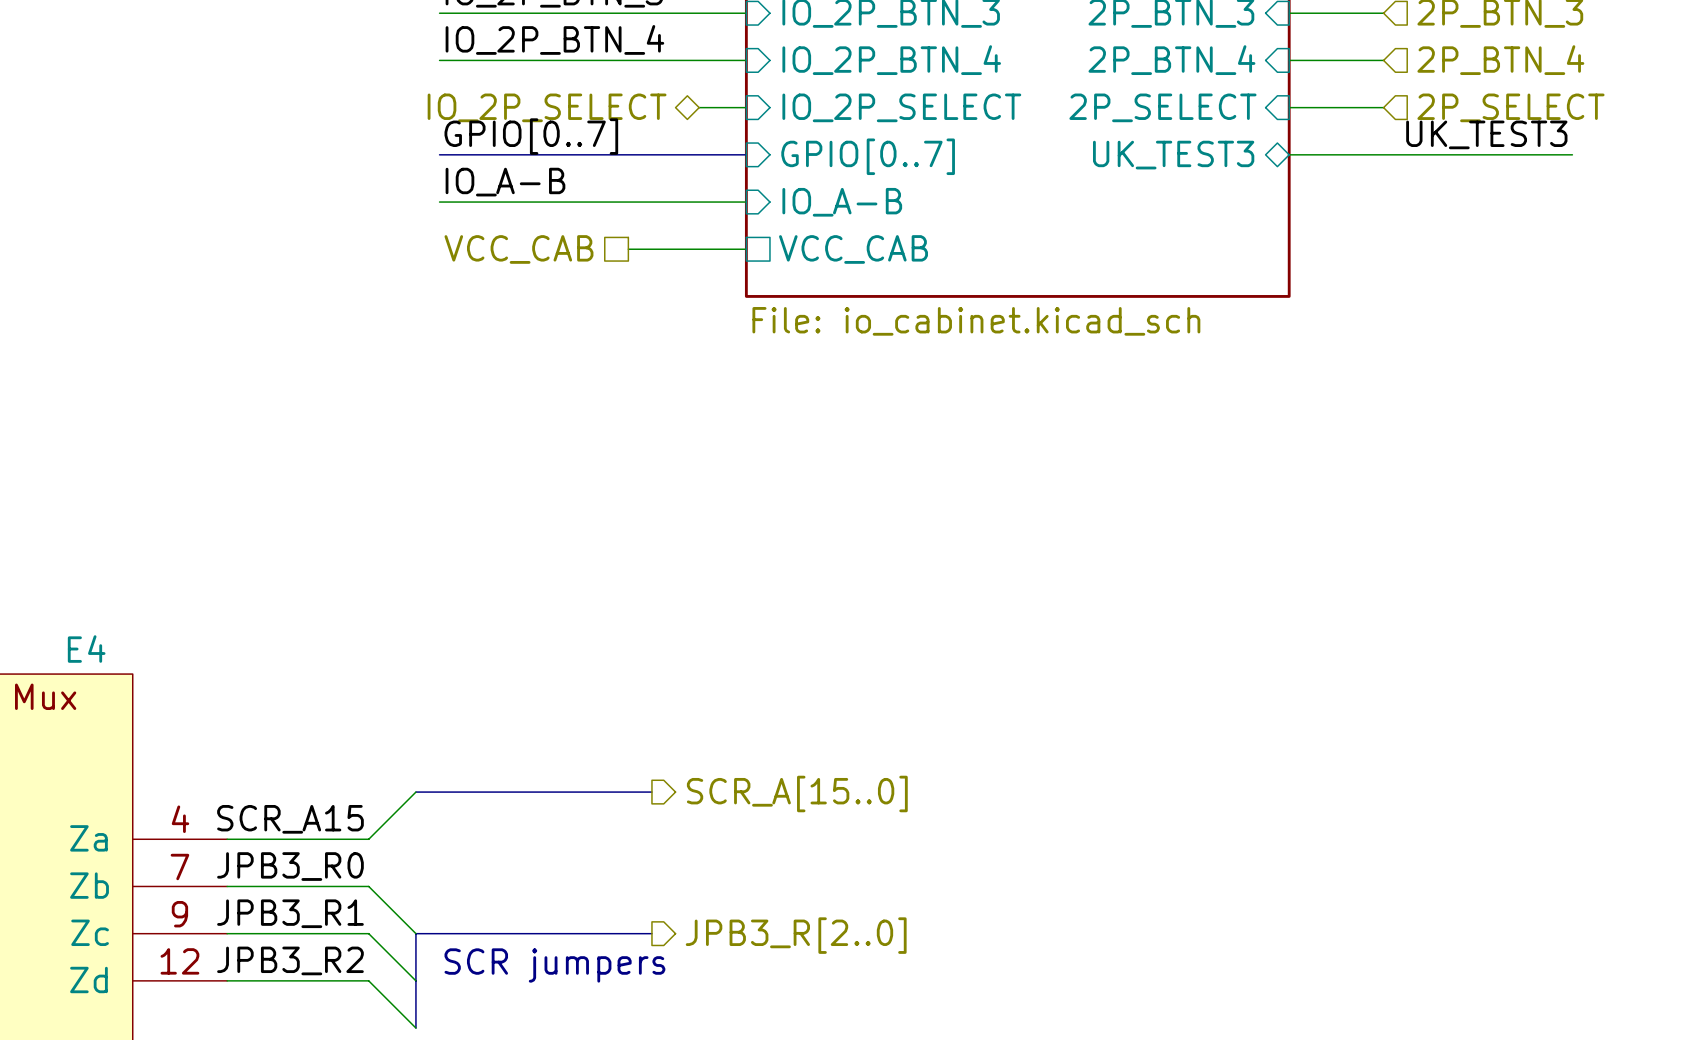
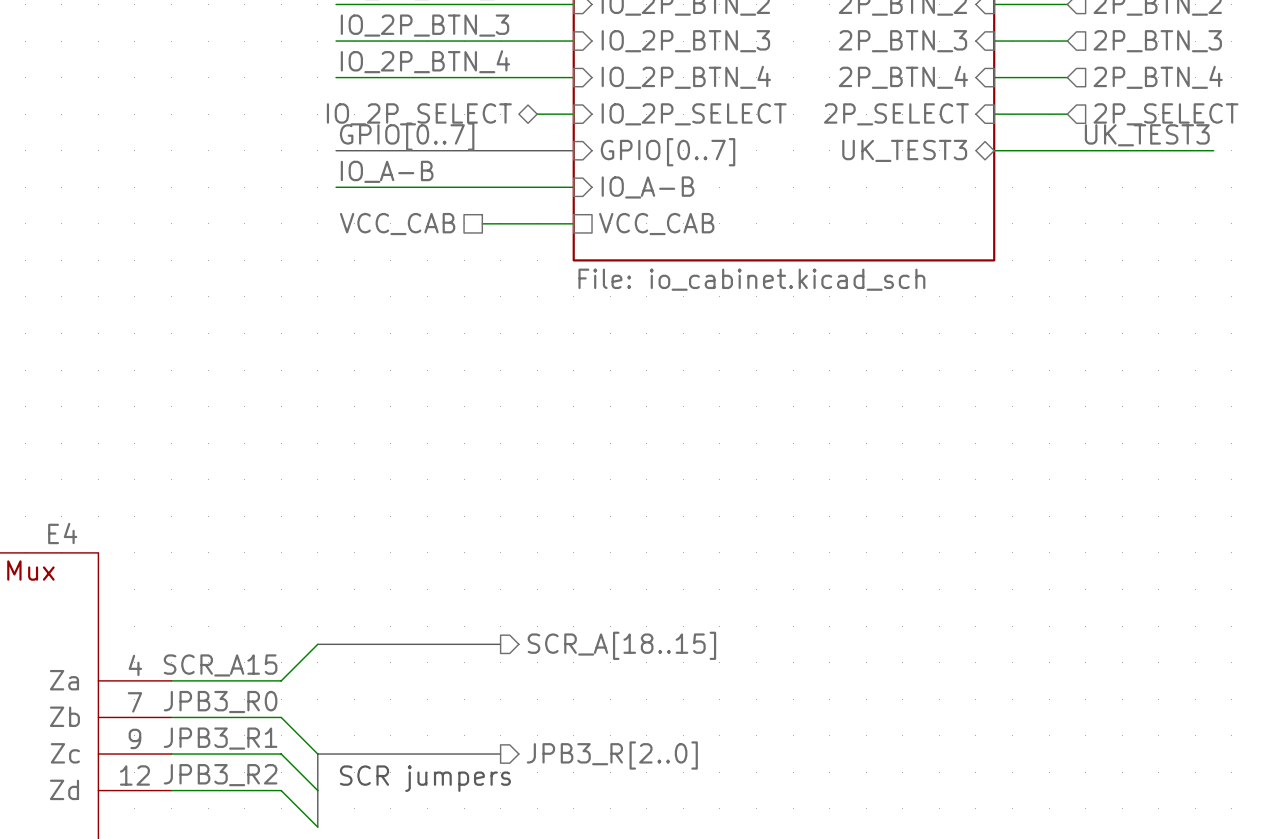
hierarchical label: SCR_A[15..0] (797, 793) -> SCR_A[18..15] (621, 645)

